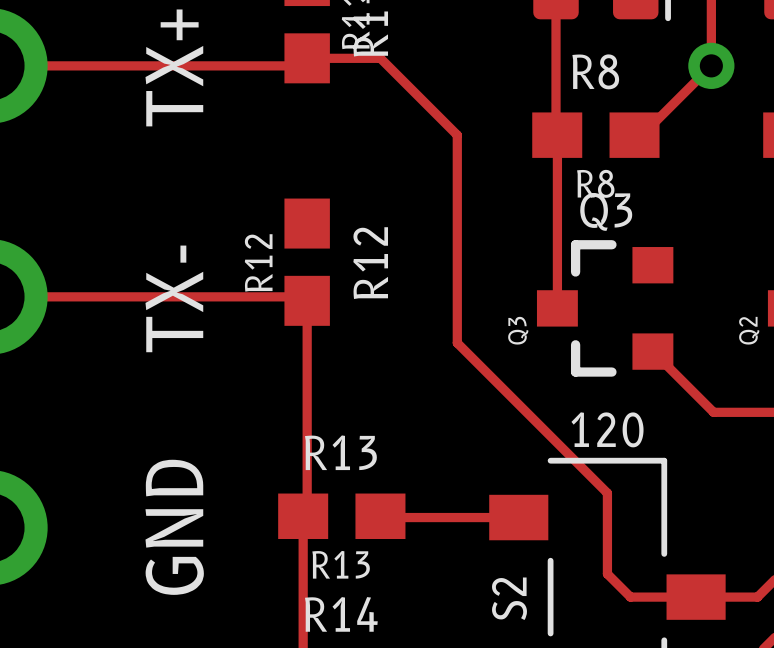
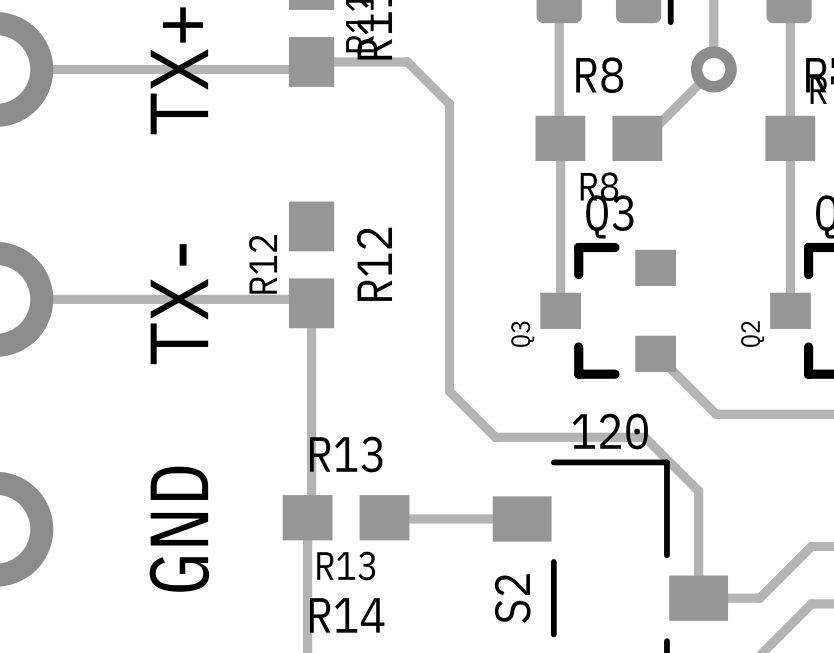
track: (380, 58) (457, 135) (457, 343) (607, 493) (607, 574) (630, 597) (696, 597) -> (384, 61) (407, 61) (449, 103) (449, 391) (495, 437) (644, 437) (698, 491) (698, 598)

